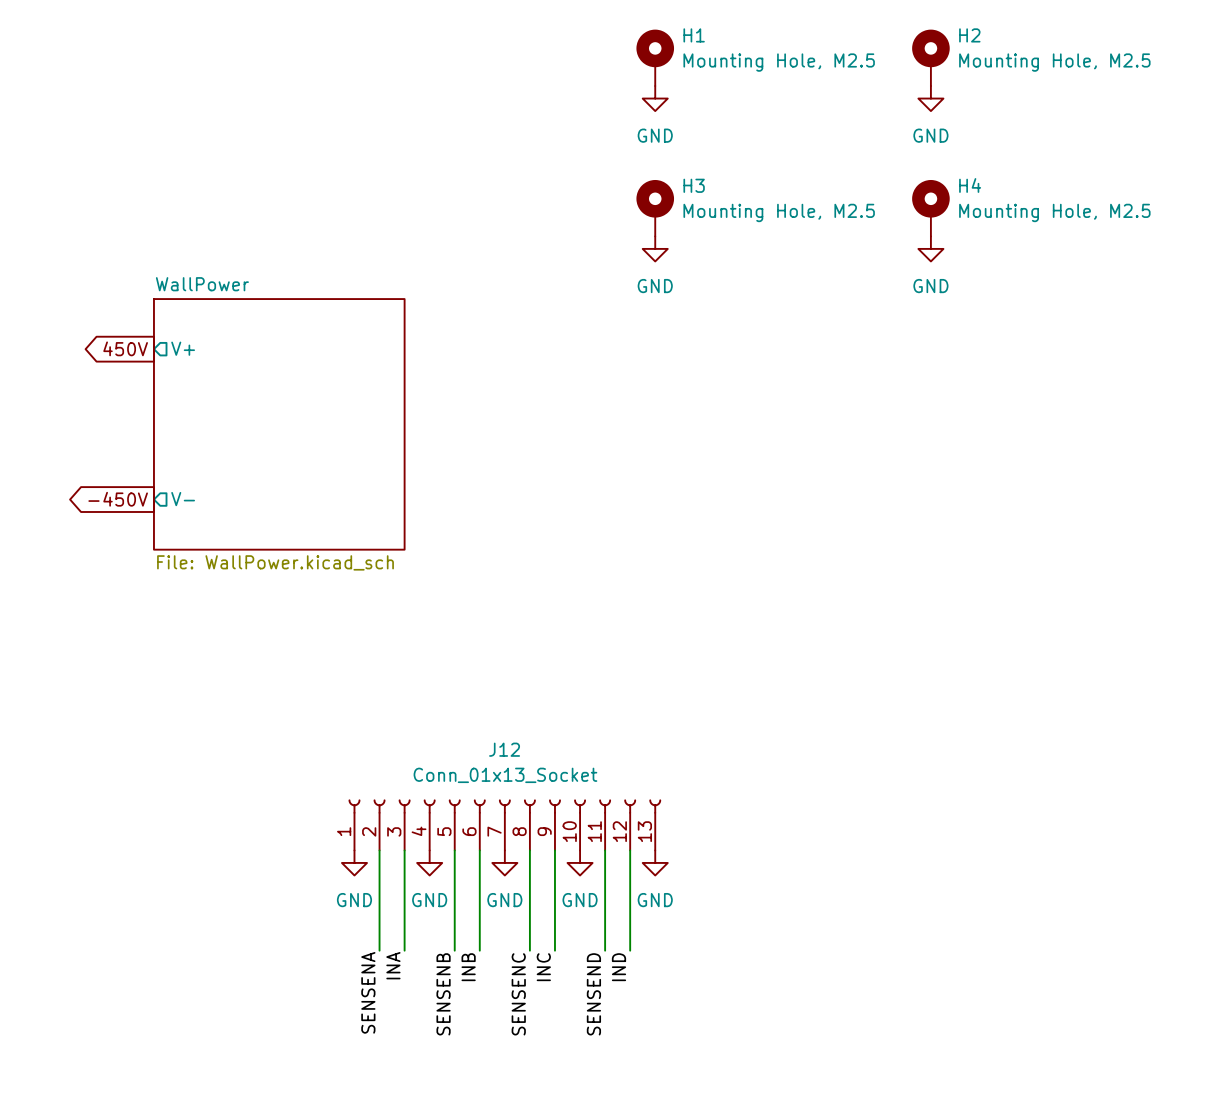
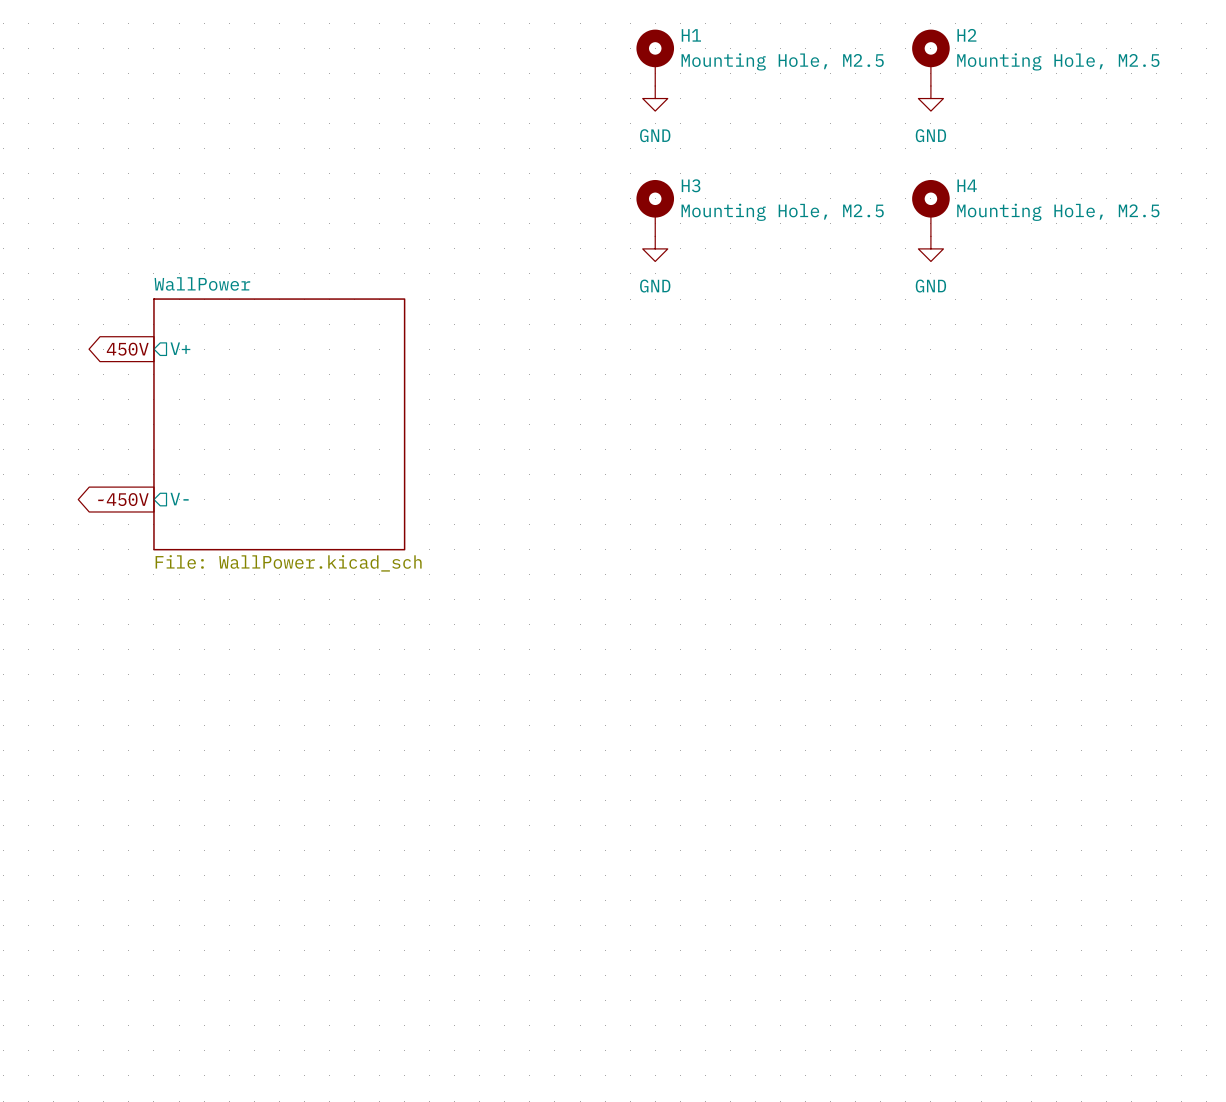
J12: Conn_01x13_Socket (504, 824) -> none
wire: (379, 850) (379, 950) -> none
wire: (404, 850) (404, 950) -> none
wire: (454, 850) (454, 950) -> none
wire: (479, 850) (479, 950) -> none
wire: (529, 850) (529, 950) -> none
wire: (554, 850) (554, 950) -> none
wire: (605, 850) (605, 950) -> none
wire: (630, 850) (630, 950) -> none
power symbol: GND (354, 862) -> none
power symbol: GND (429, 862) -> none
power symbol: GND (504, 862) -> none
power symbol: GND (580, 862) -> none
power symbol: GND (655, 862) -> none
label: INA (393, 965) -> none
label: INB (468, 967) -> none
label: INC (543, 967) -> none
label: IND (618, 967) -> none
label: SENSENA (368, 992) -> none
label: SENSENB (443, 994) -> none
label: SENSENC (518, 994) -> none
label: SENSEND (593, 994) -> none

